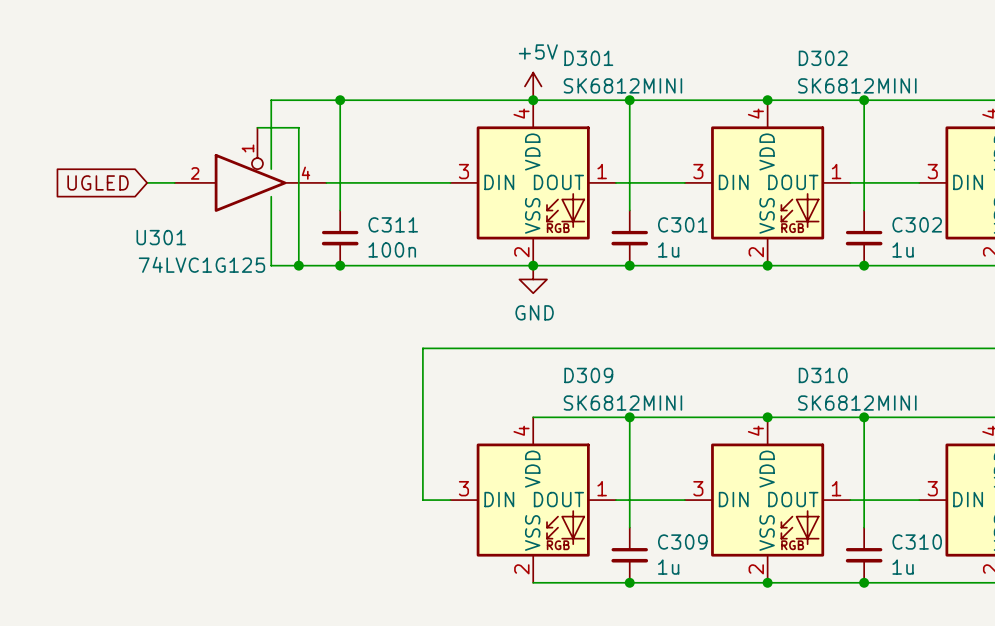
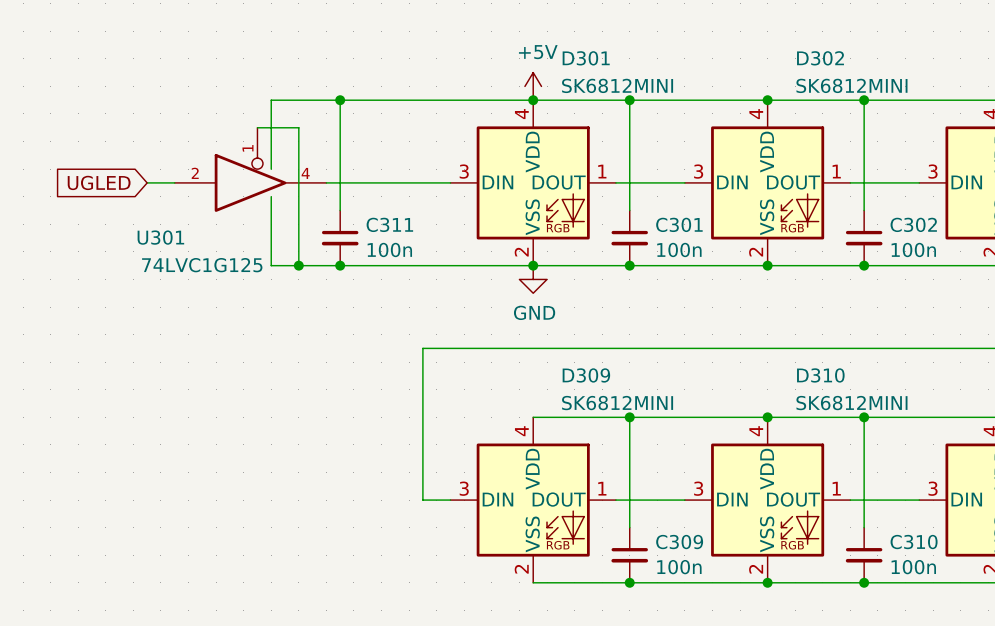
C301 value: 1u (668, 249) -> 100n (679, 249)
C302 value: 1u (903, 249) -> 100n (913, 249)
C309 value: 1u (668, 567) -> 100n (679, 567)
C310 value: 1u (903, 567) -> 100n (913, 567)

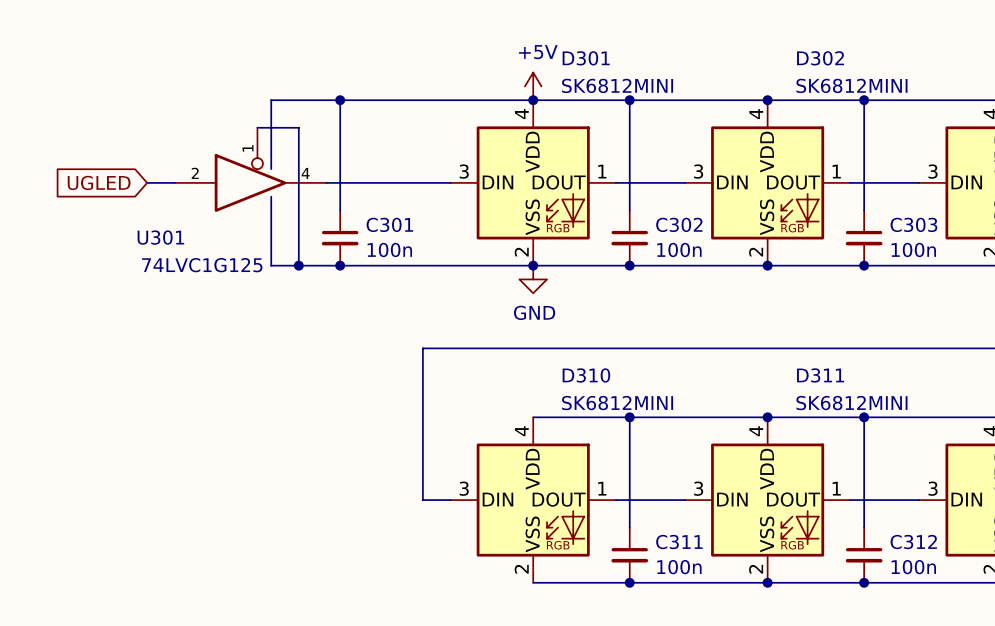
C311 name: C311 (389, 224) -> C301 (389, 224)
C301 name: C301 (679, 224) -> C302 (679, 224)
C302 name: C302 (913, 224) -> C303 (913, 224)
D309 name: D309 (586, 375) -> D310 (586, 375)
D310 name: D310 (820, 375) -> D311 (820, 375)
C309 name: C309 (679, 542) -> C311 (679, 542)
C310 name: C310 (914, 542) -> C312 (913, 542)

